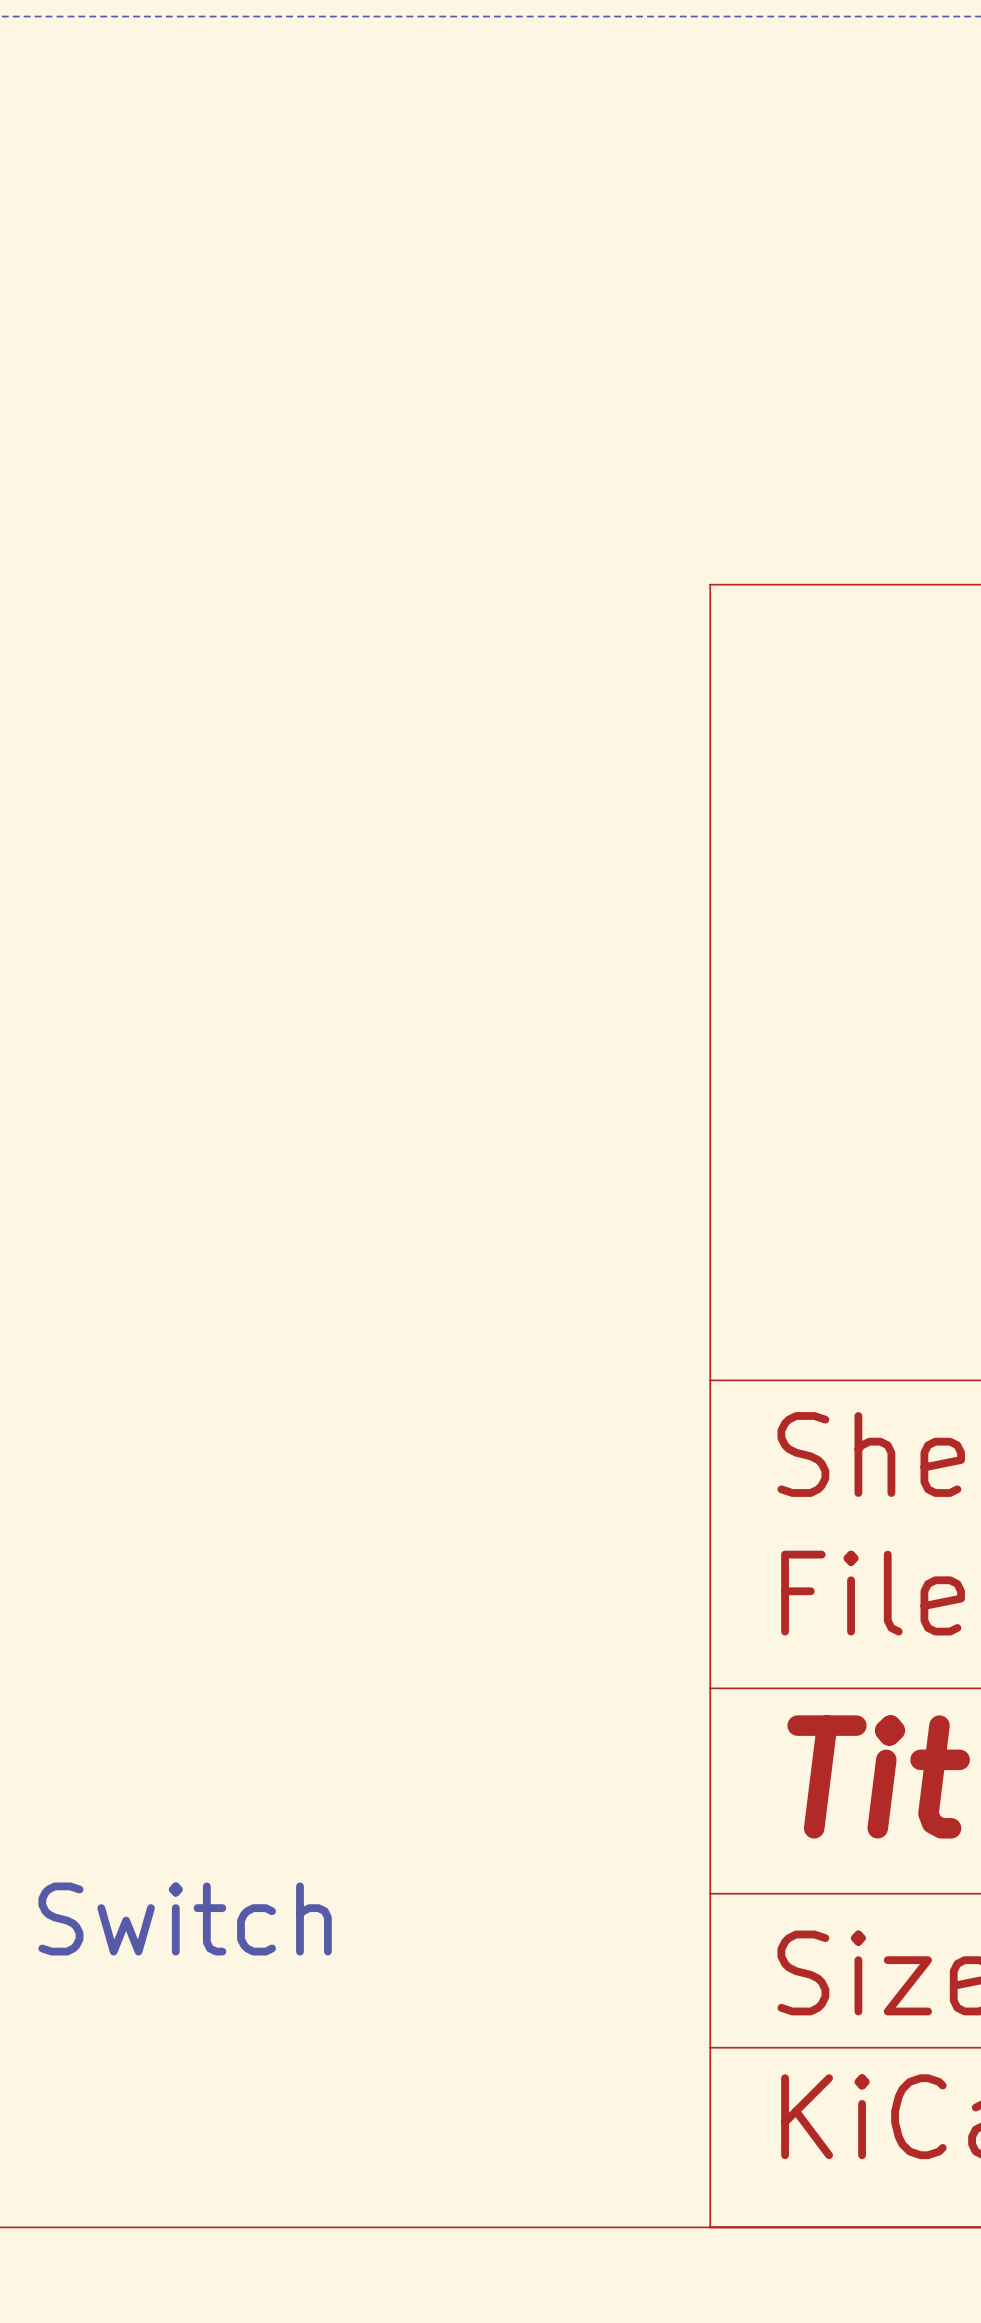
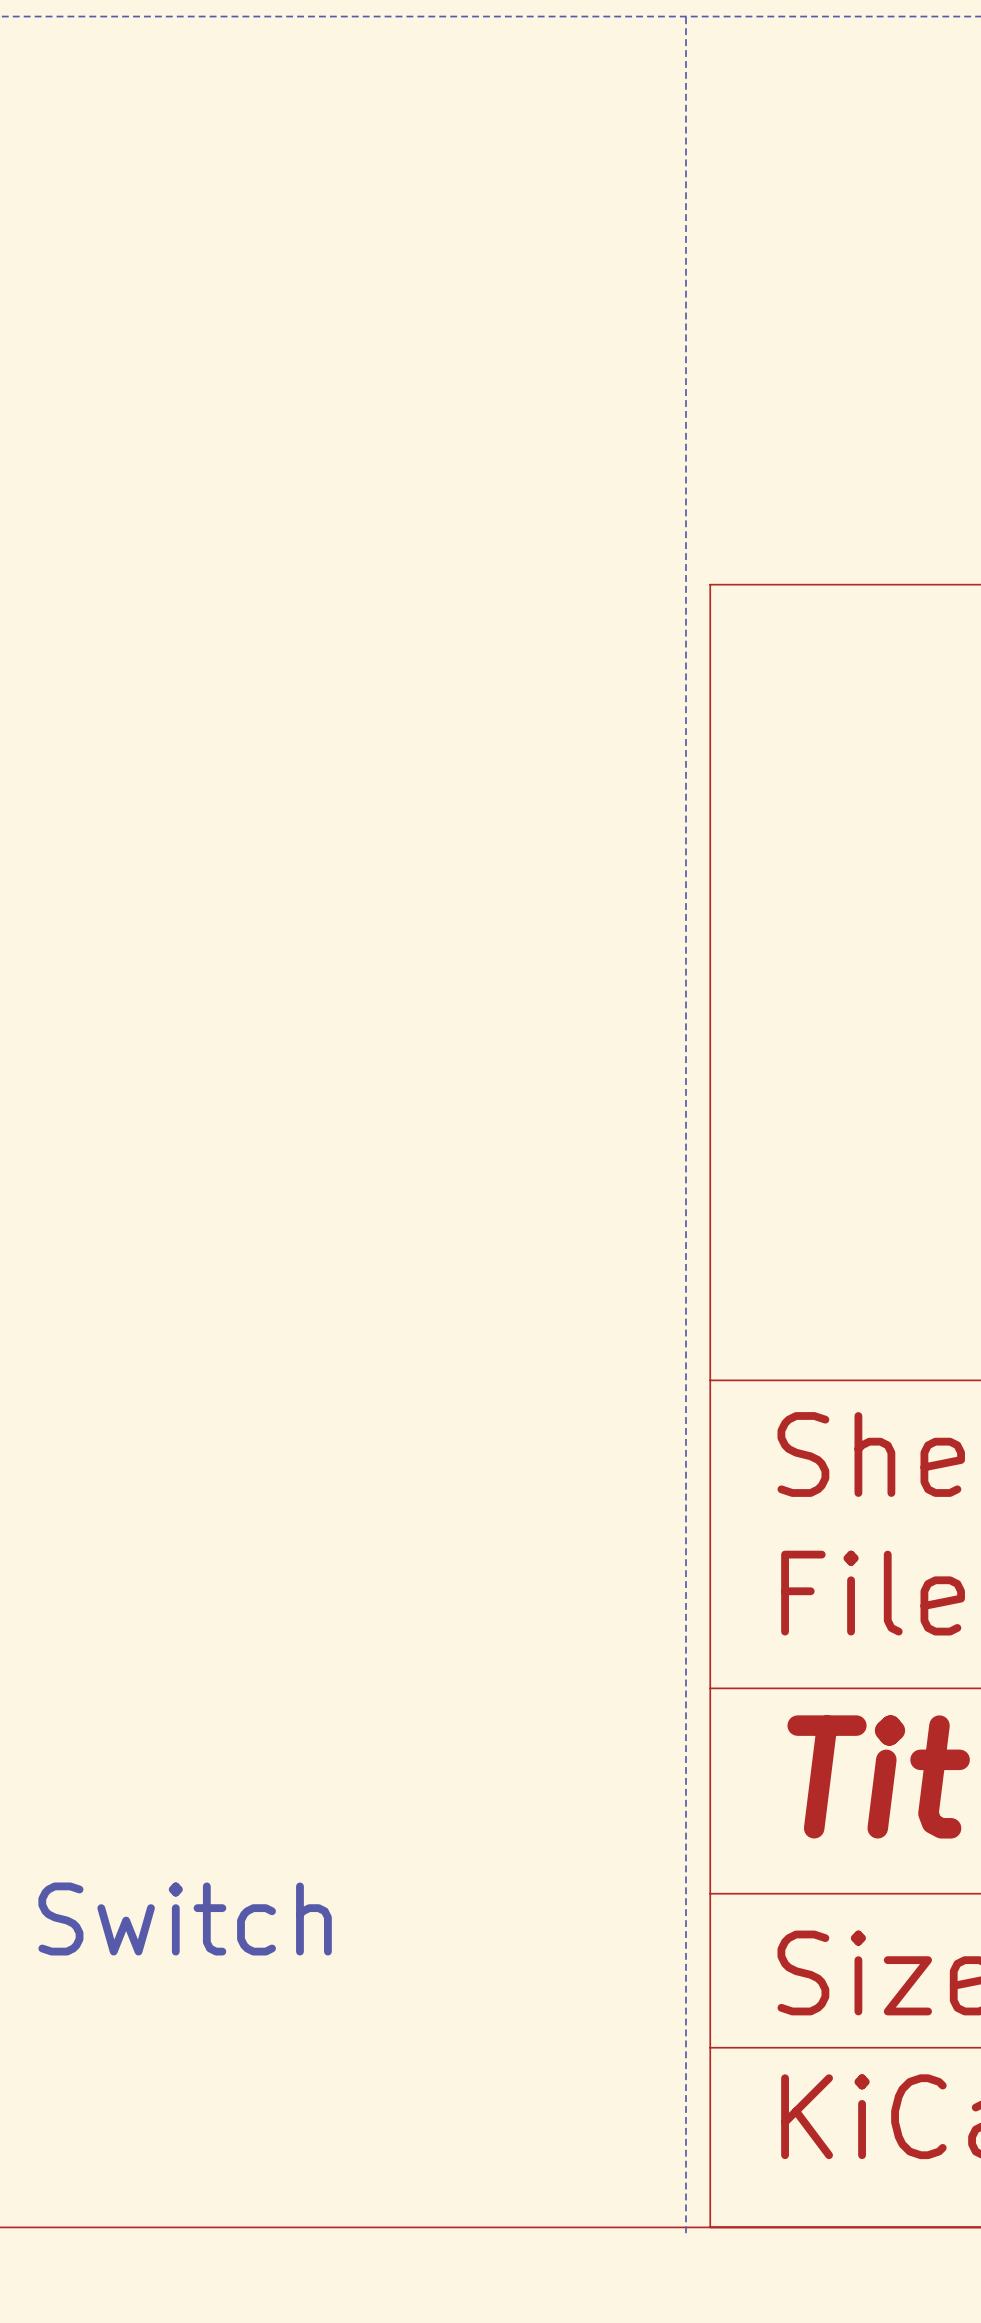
line: none -> (686, 16) (686, 2233)

